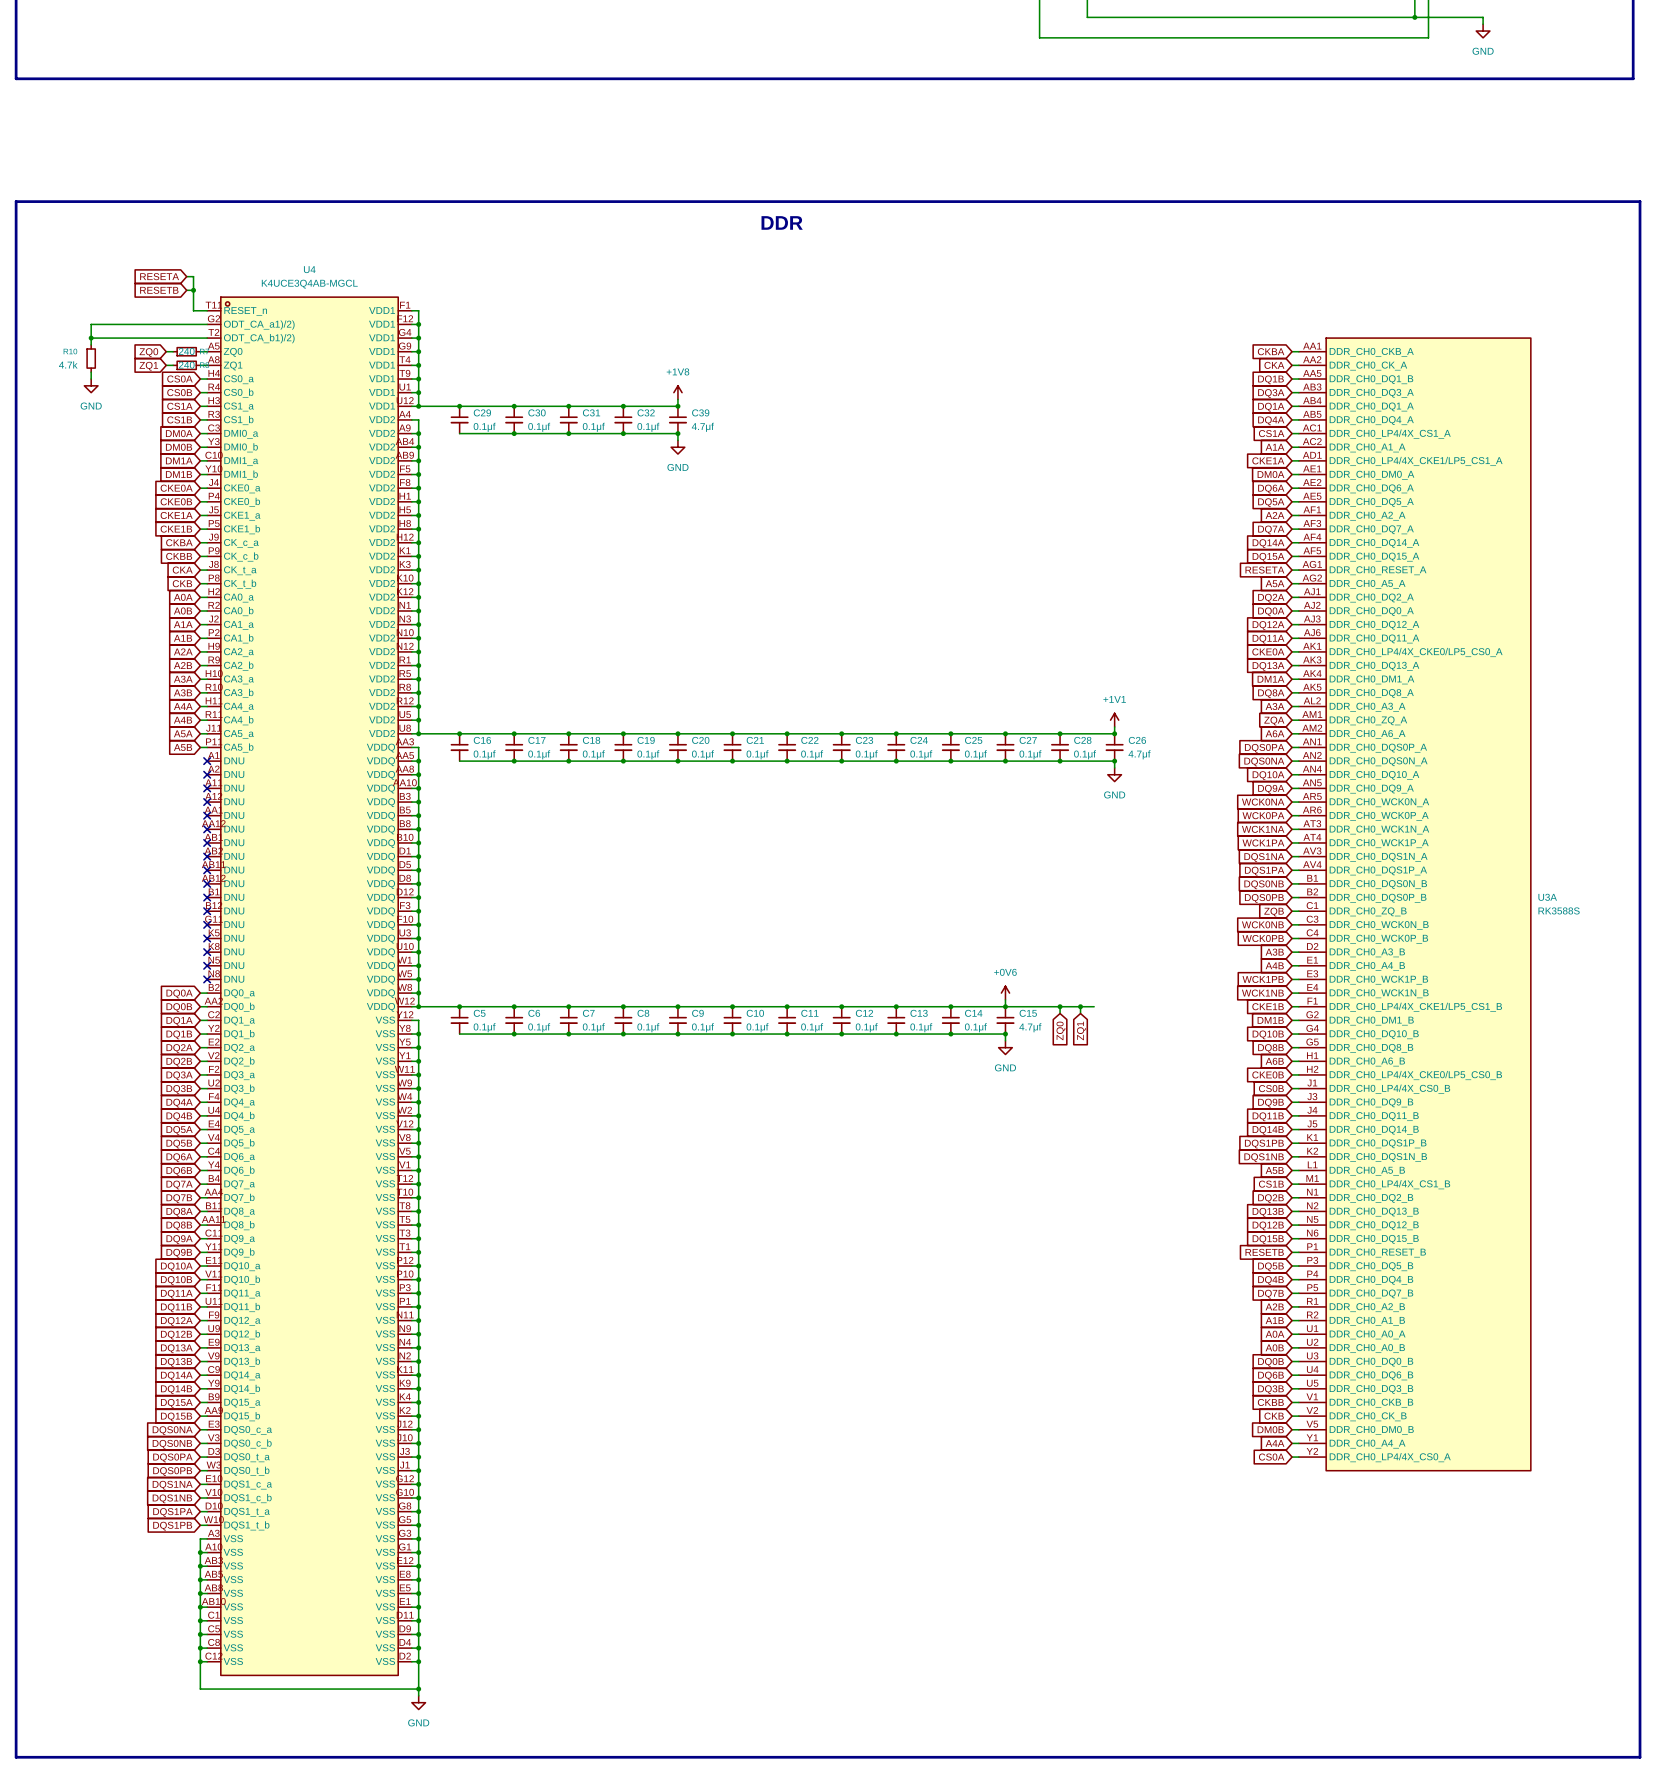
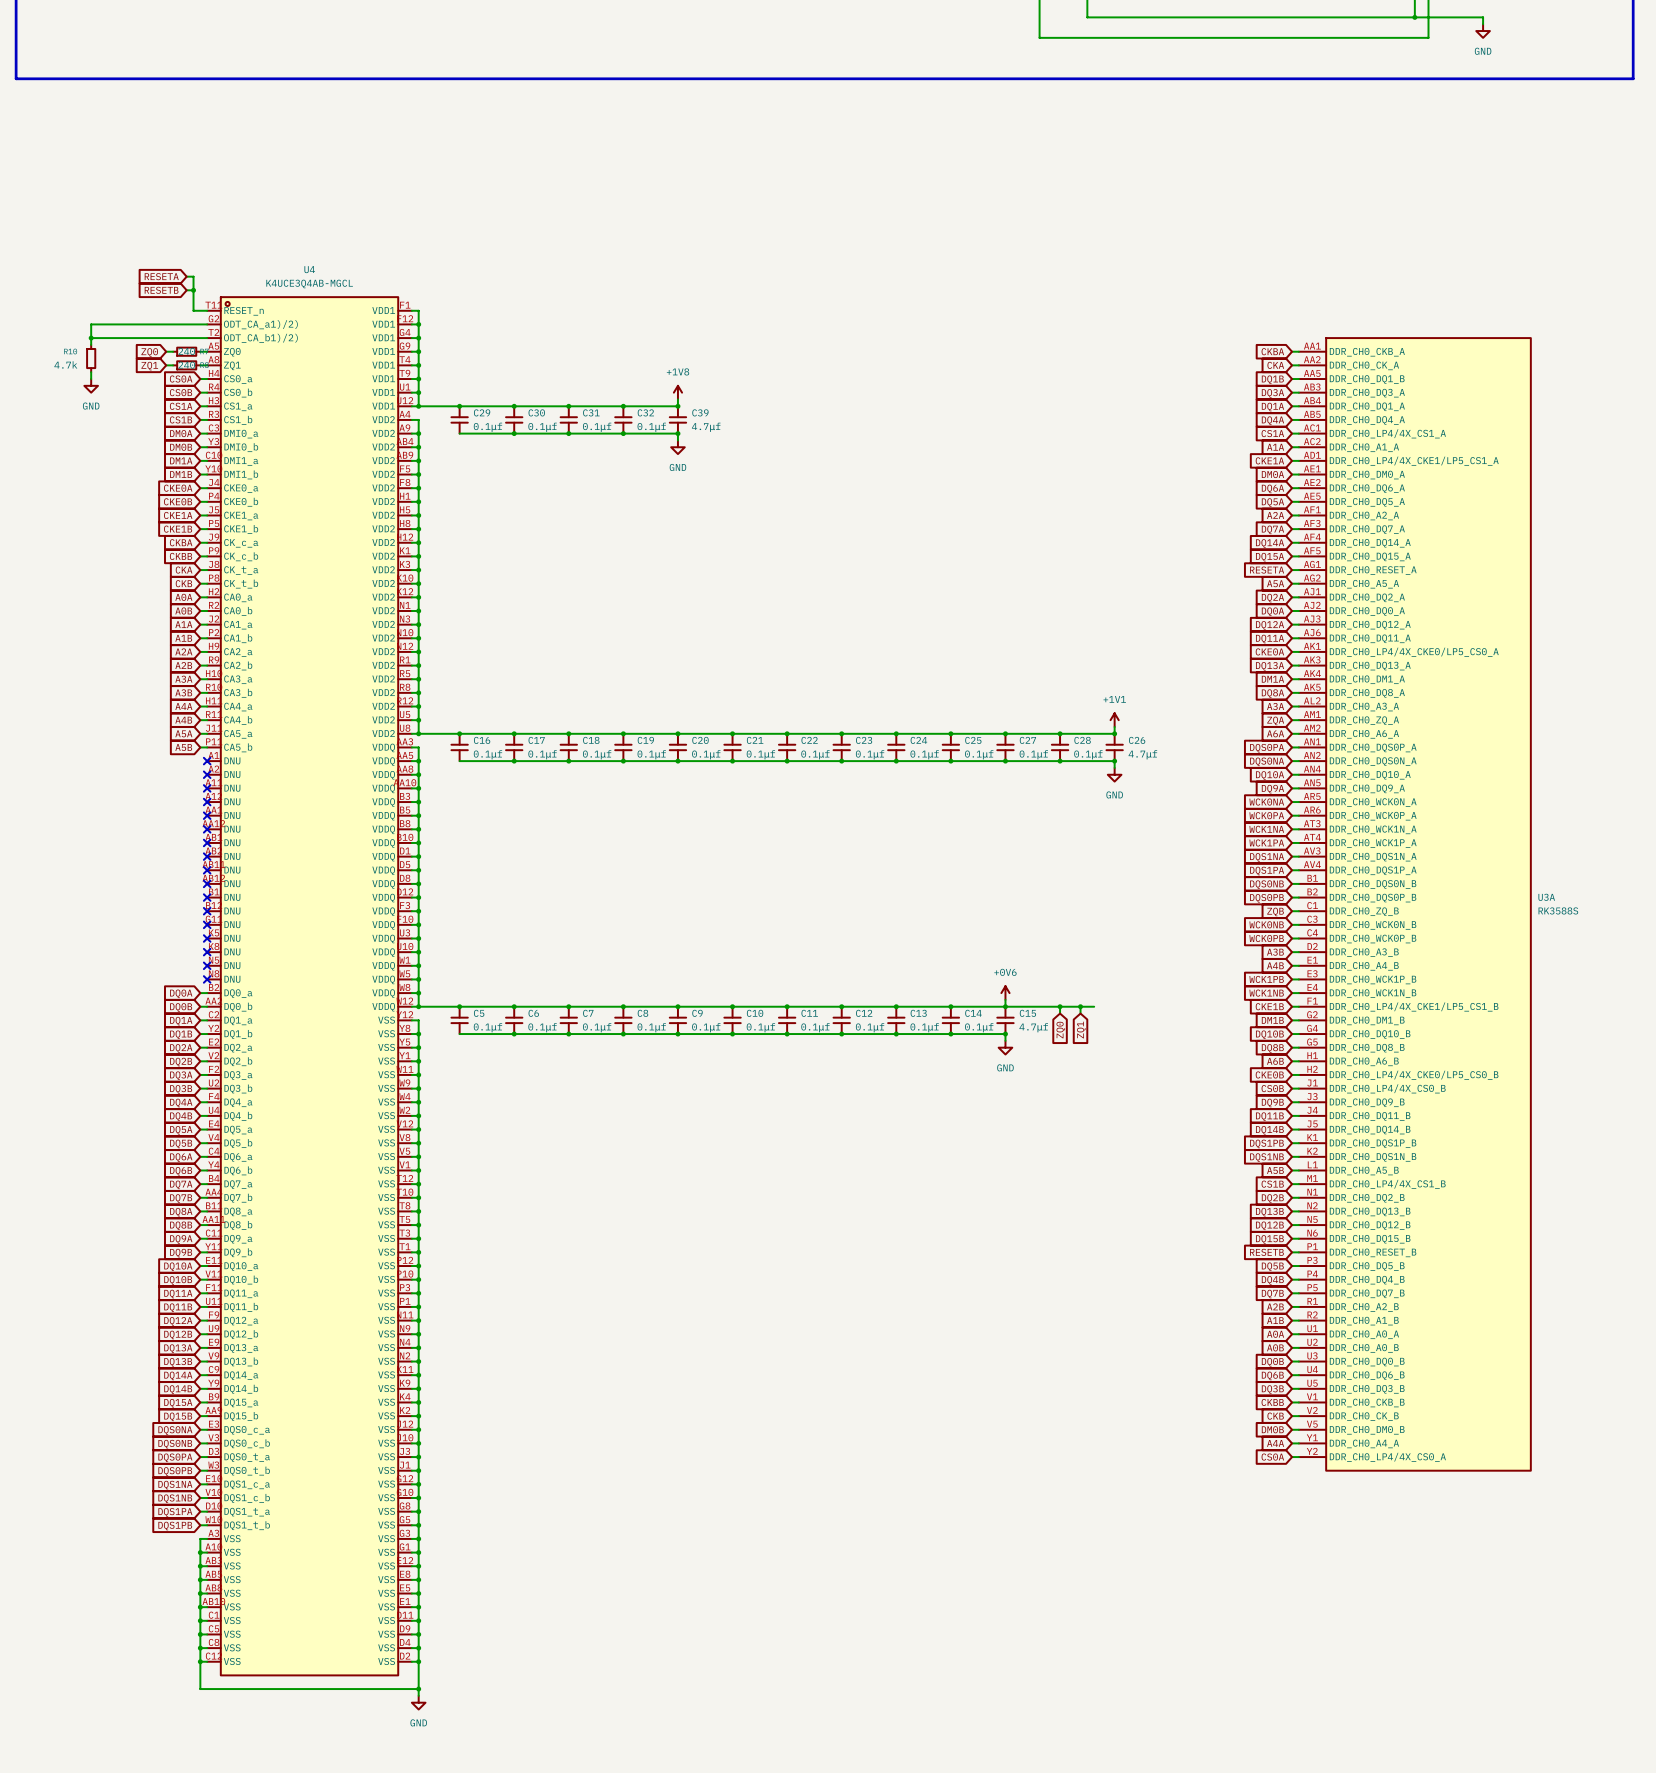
line: (16, 201) (16, 1757) (1640, 1757) (1640, 201) (16, 201) -> none
text: DDR (782, 222) -> none

